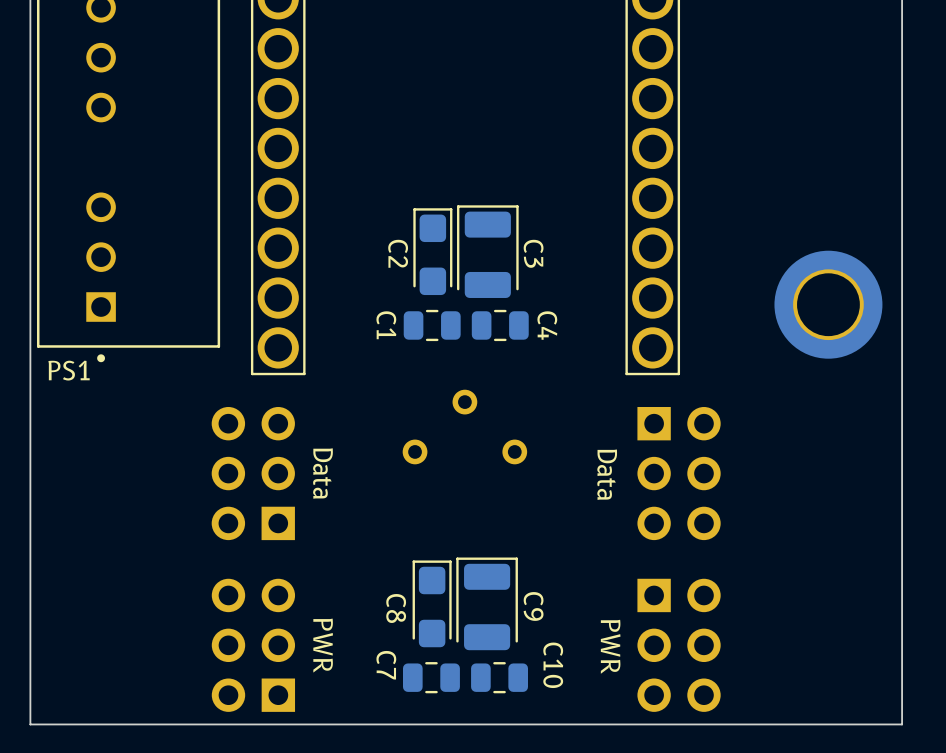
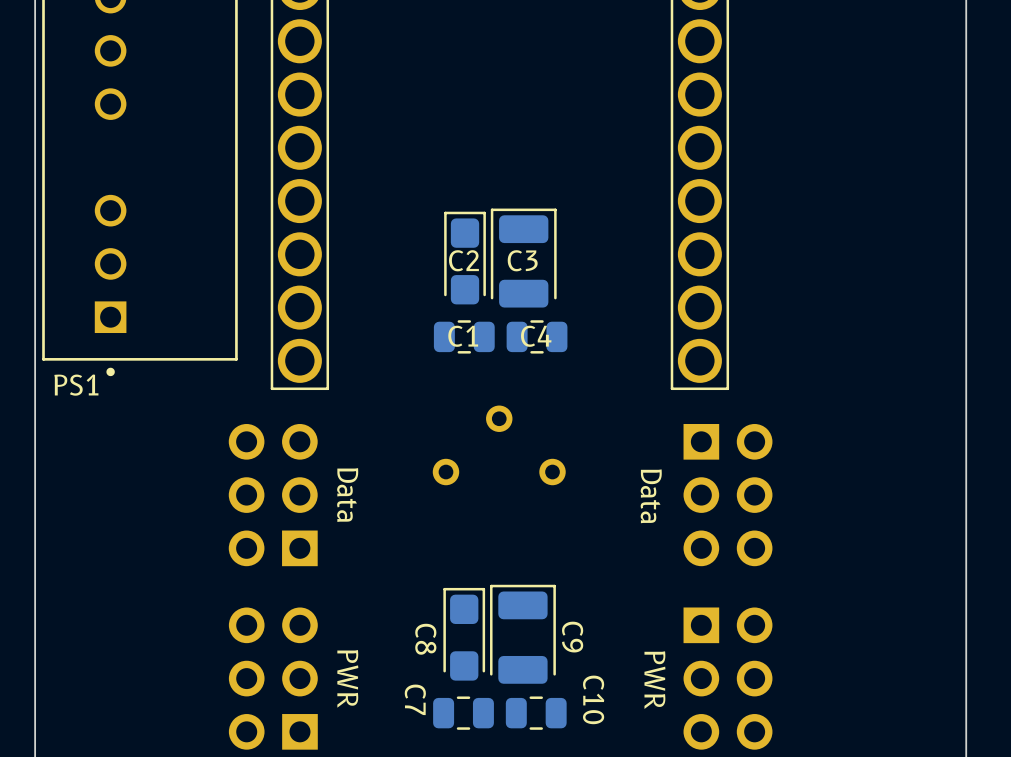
C2 name rotation: 0° (398, 253) -> 90° counterclockwise (463, 260)
C3 name rotation: 0° (533, 253) -> 90° counterclockwise (522, 260)
part: (828, 304) -> none
C1 name rotation: 0° (386, 325) -> 90° counterclockwise (463, 336)
C4 name rotation: 0° (547, 325) -> 90° counterclockwise (536, 336)

